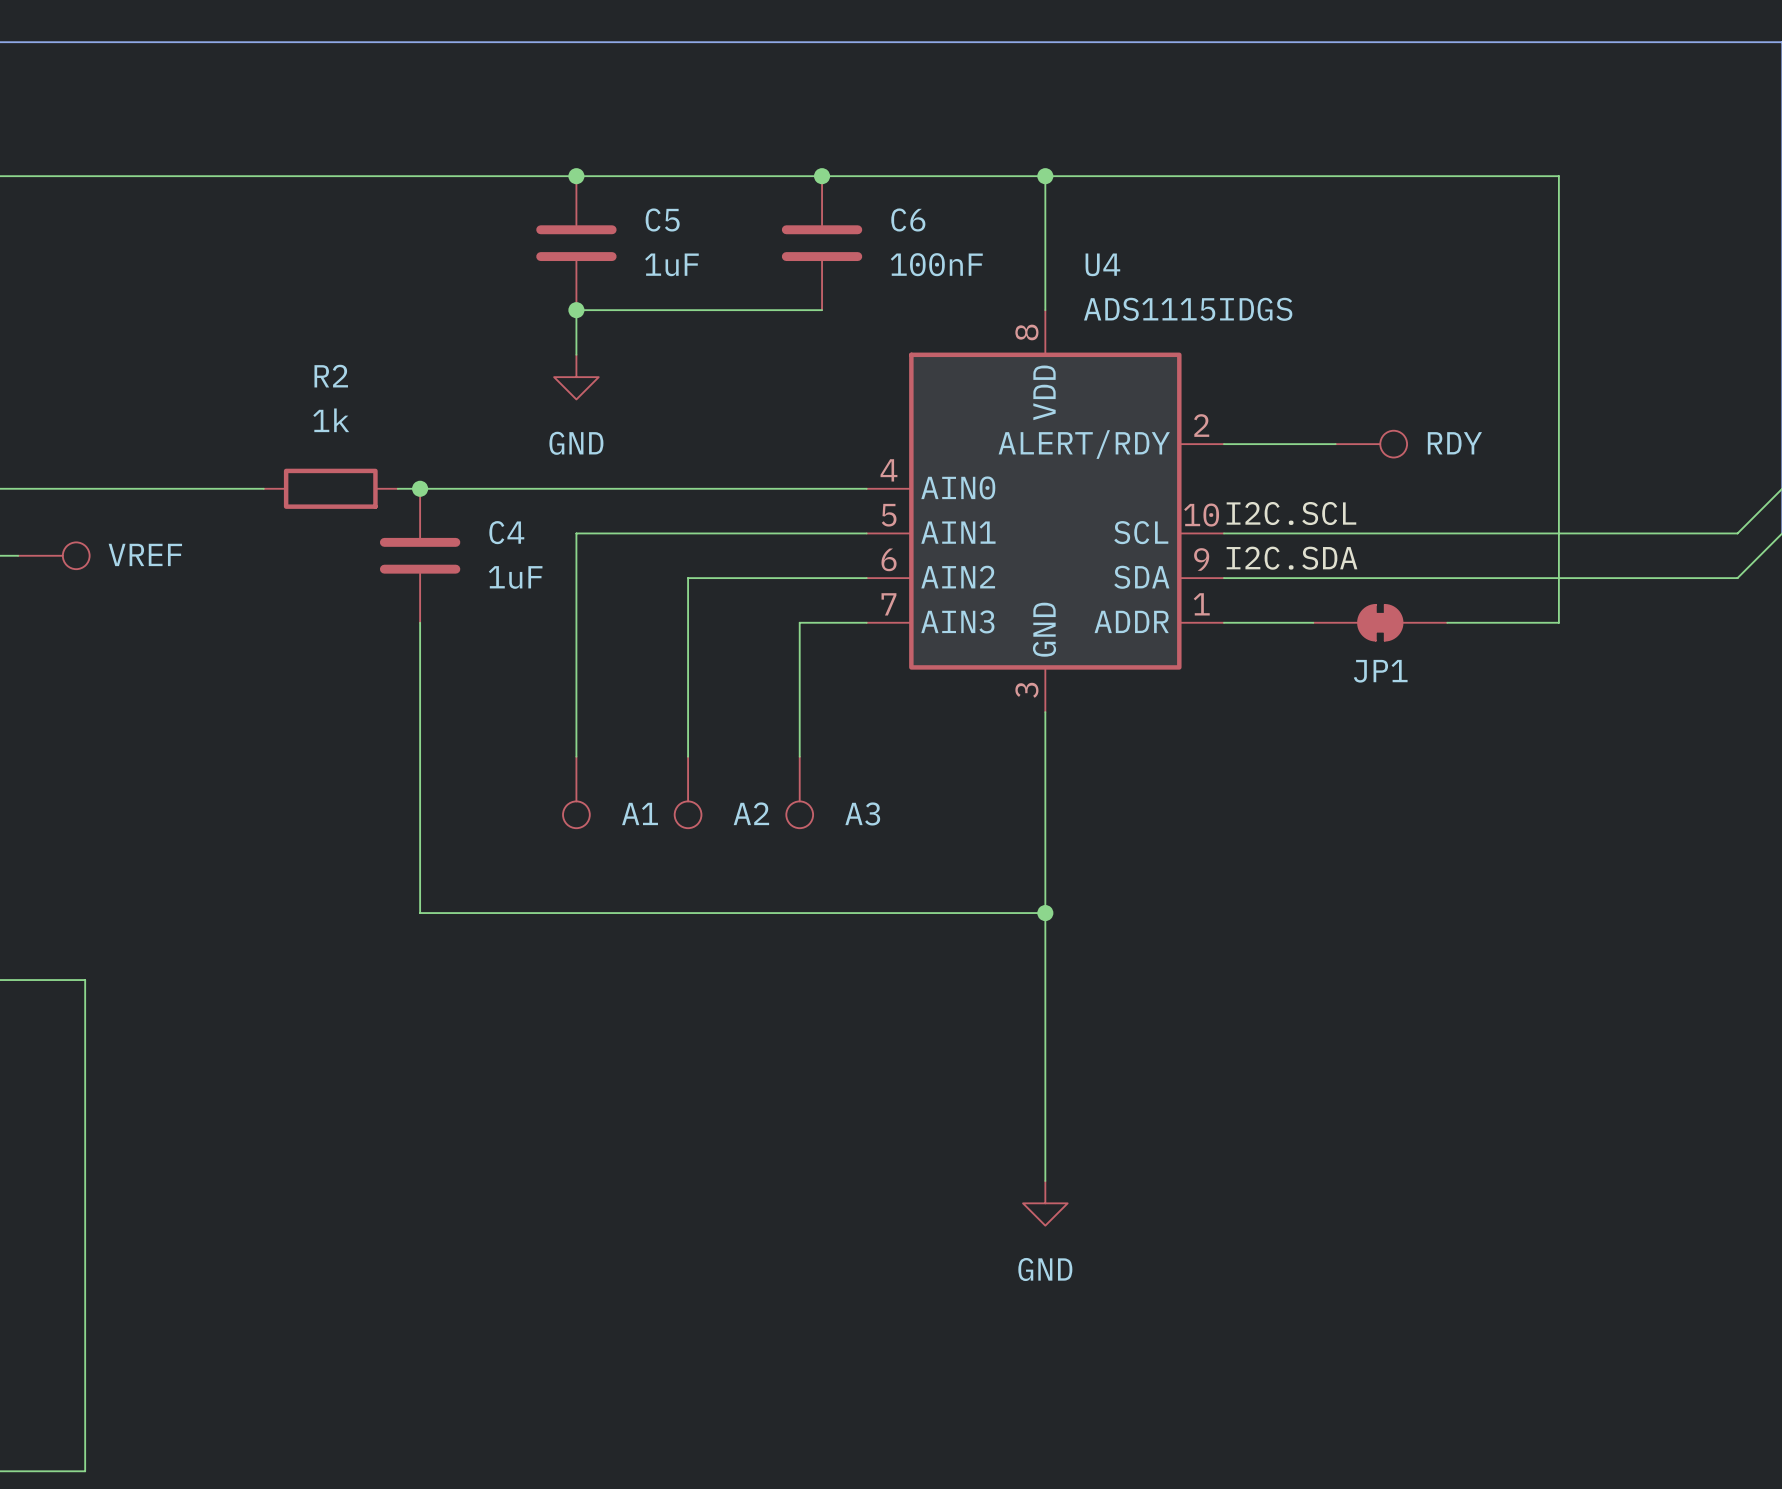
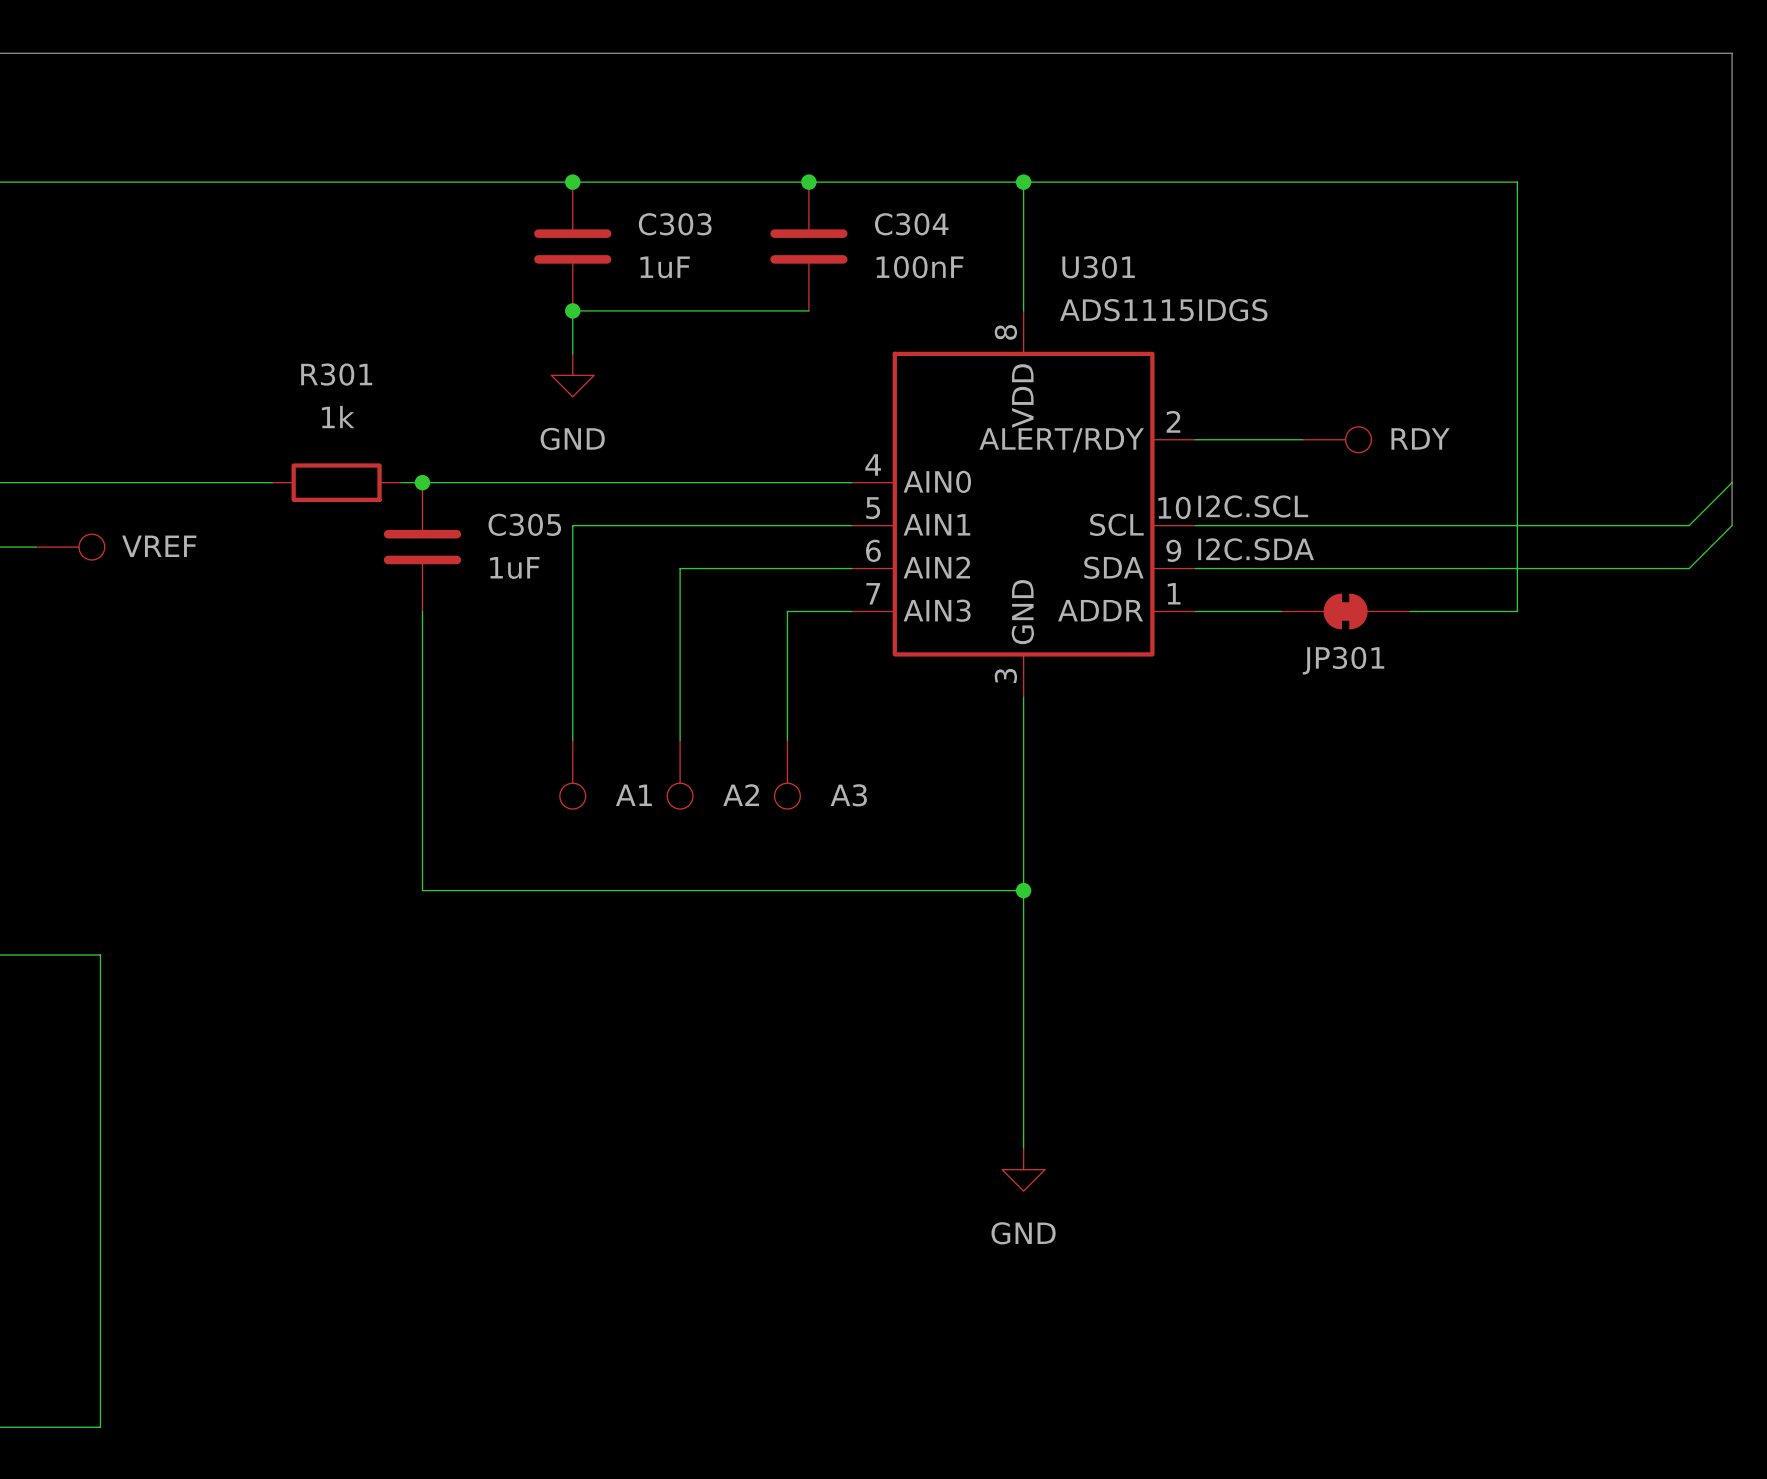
C5 name: C5 (662, 219) -> C303 (675, 224)
C6 name: C6 (908, 219) -> C304 (911, 224)
U4 name: U4 (1102, 264) -> U301 (1098, 267)
R2 name: R2 (331, 376) -> R301 (336, 374)
C4 name: C4 (506, 532) -> C305 (524, 524)
JP1 name: JP1 (1380, 671) -> JP301 (1343, 660)

